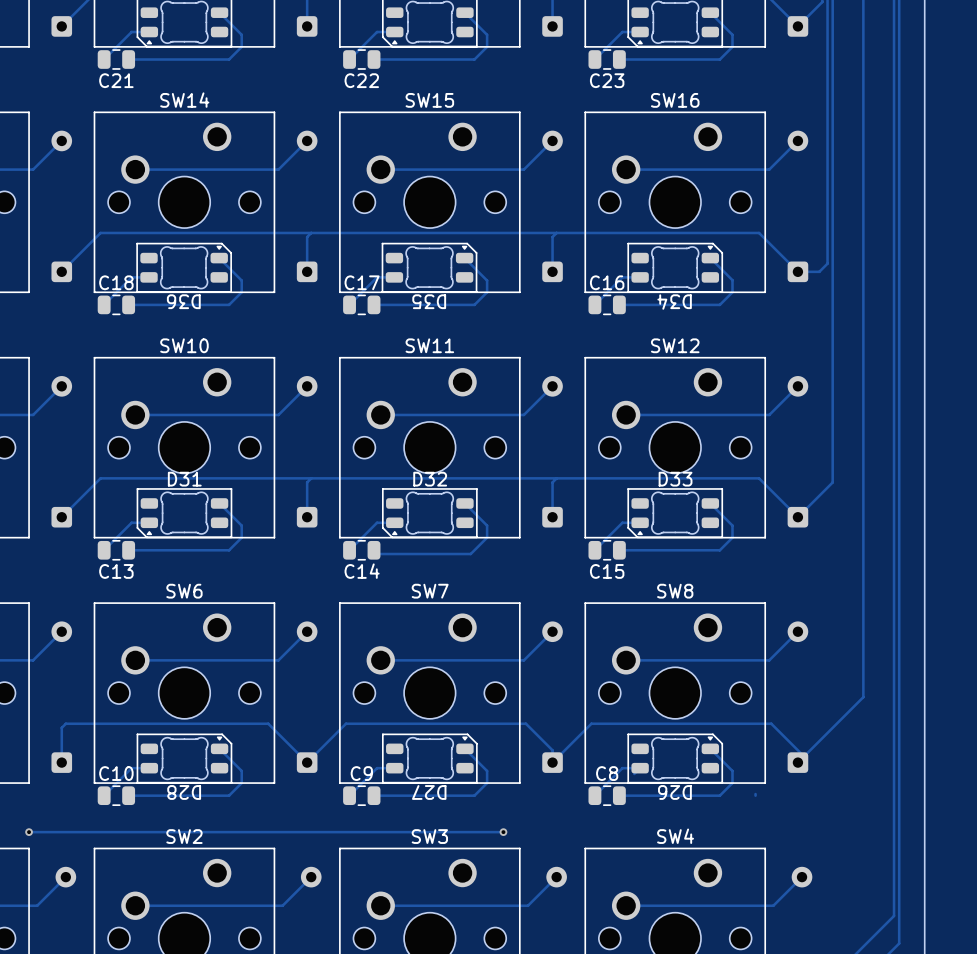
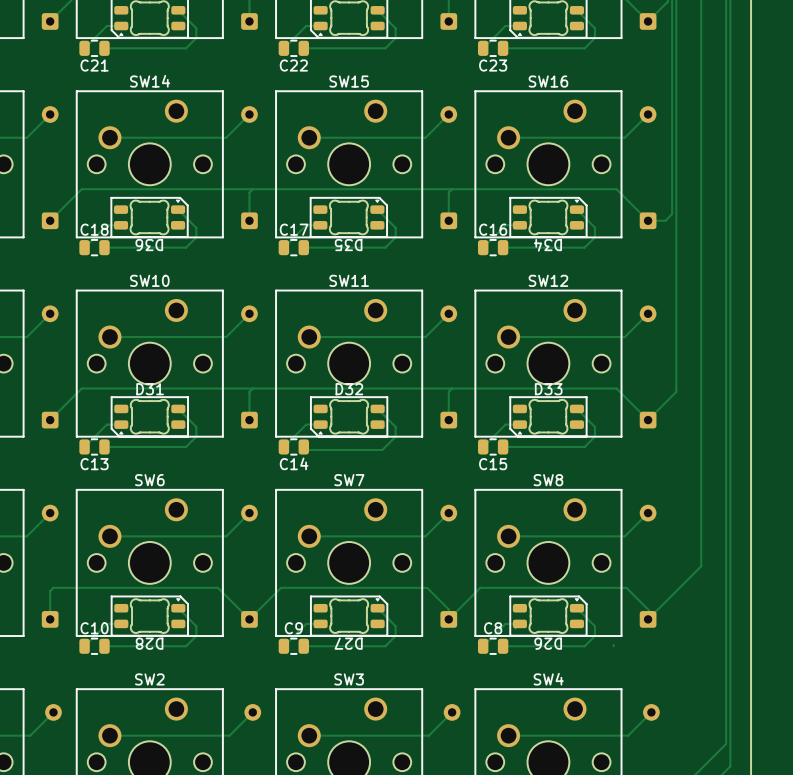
track: (29, 832) (503, 832) -> none
via: (29, 832) -> none
via: (503, 832) -> none

